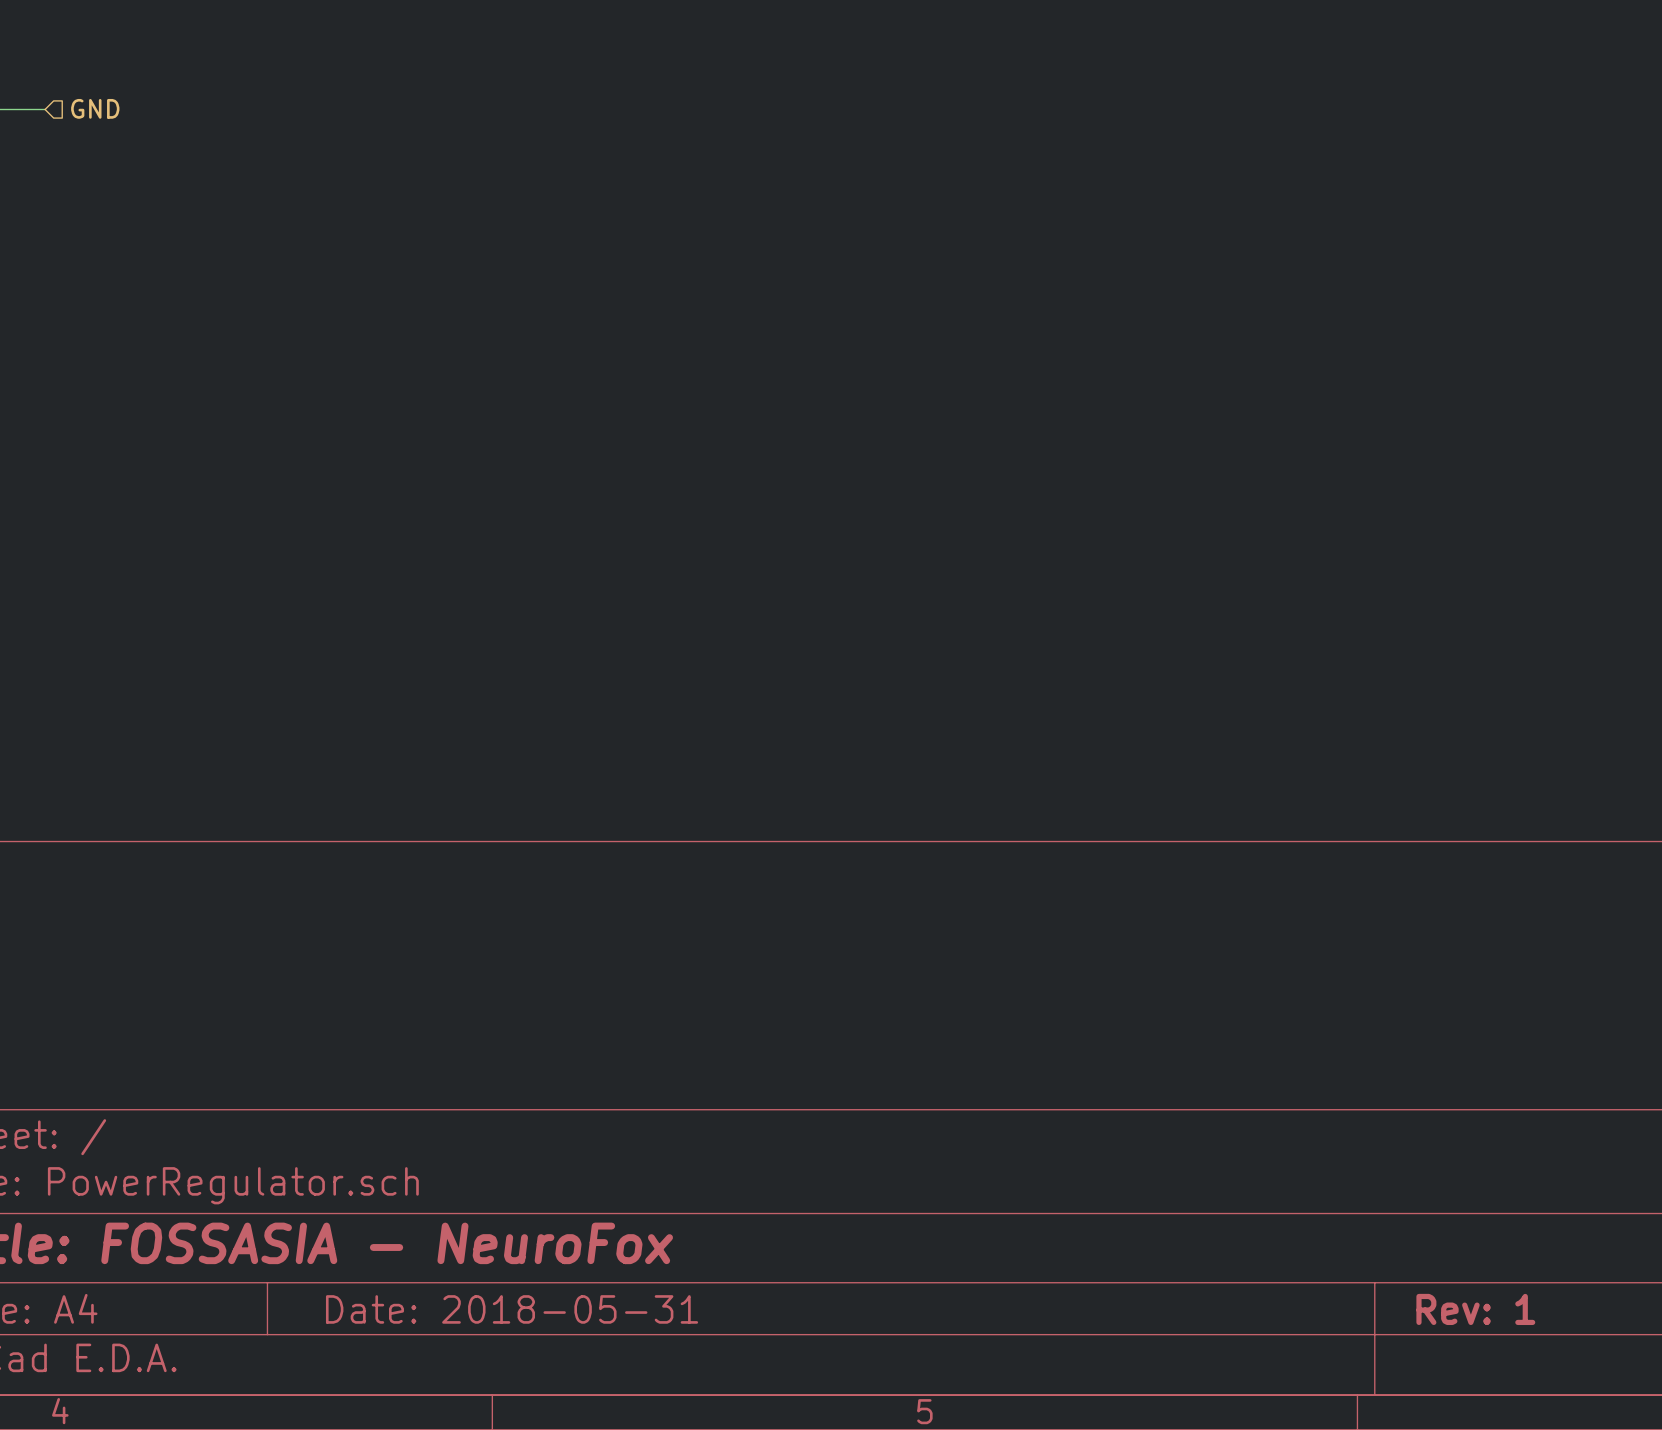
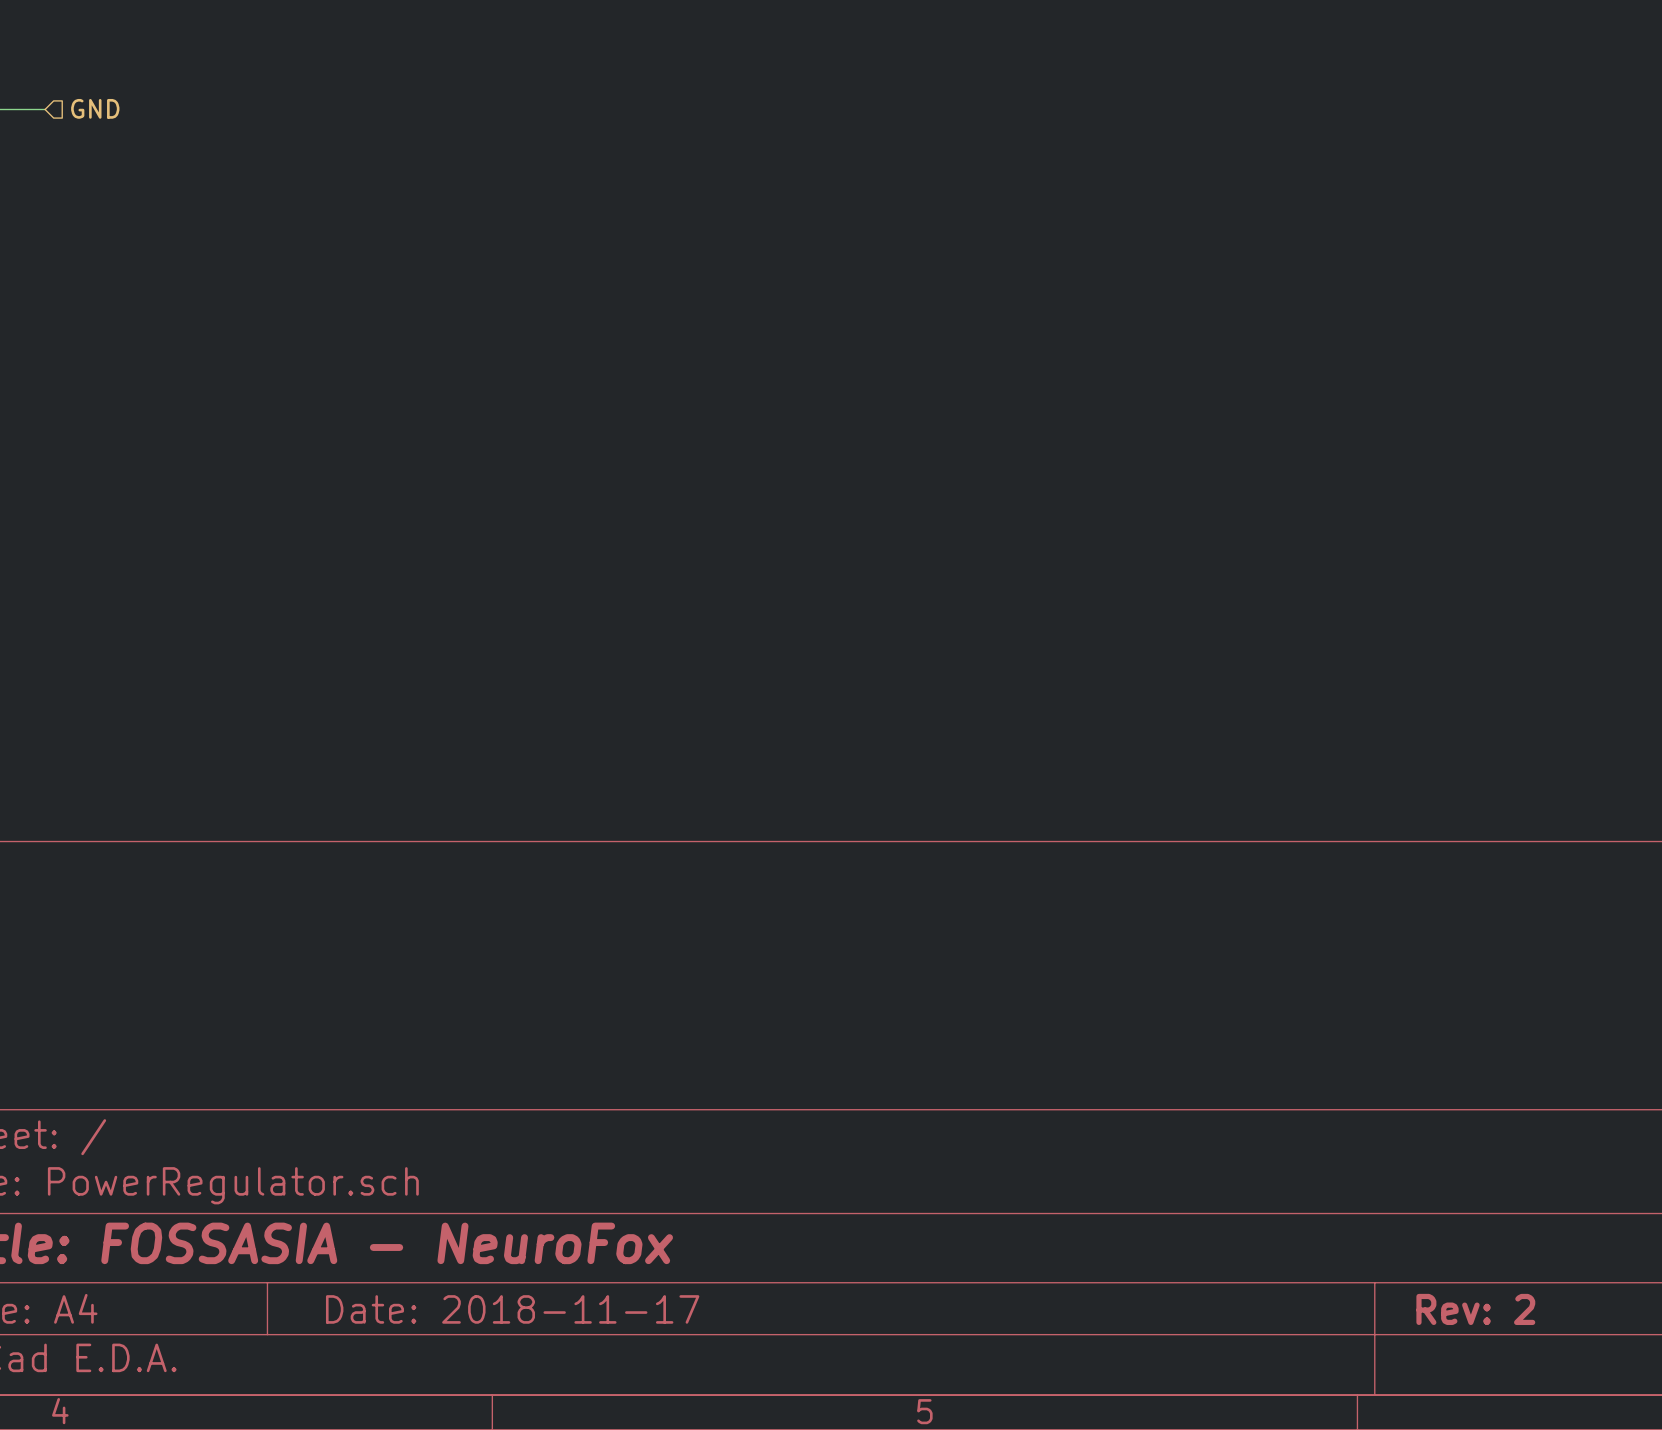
title block: Date: 2018-05-31 (512, 1309) -> Date: 2018-11-17 (512, 1309)
title block: Rev: 1 (1475, 1309) -> Rev: 2 (1475, 1309)

